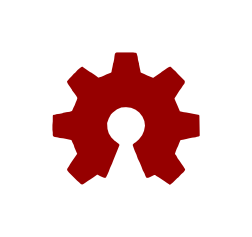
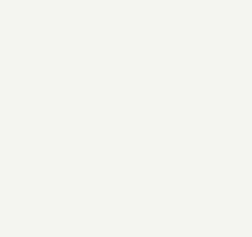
power symbol: (126, 118) -> none

